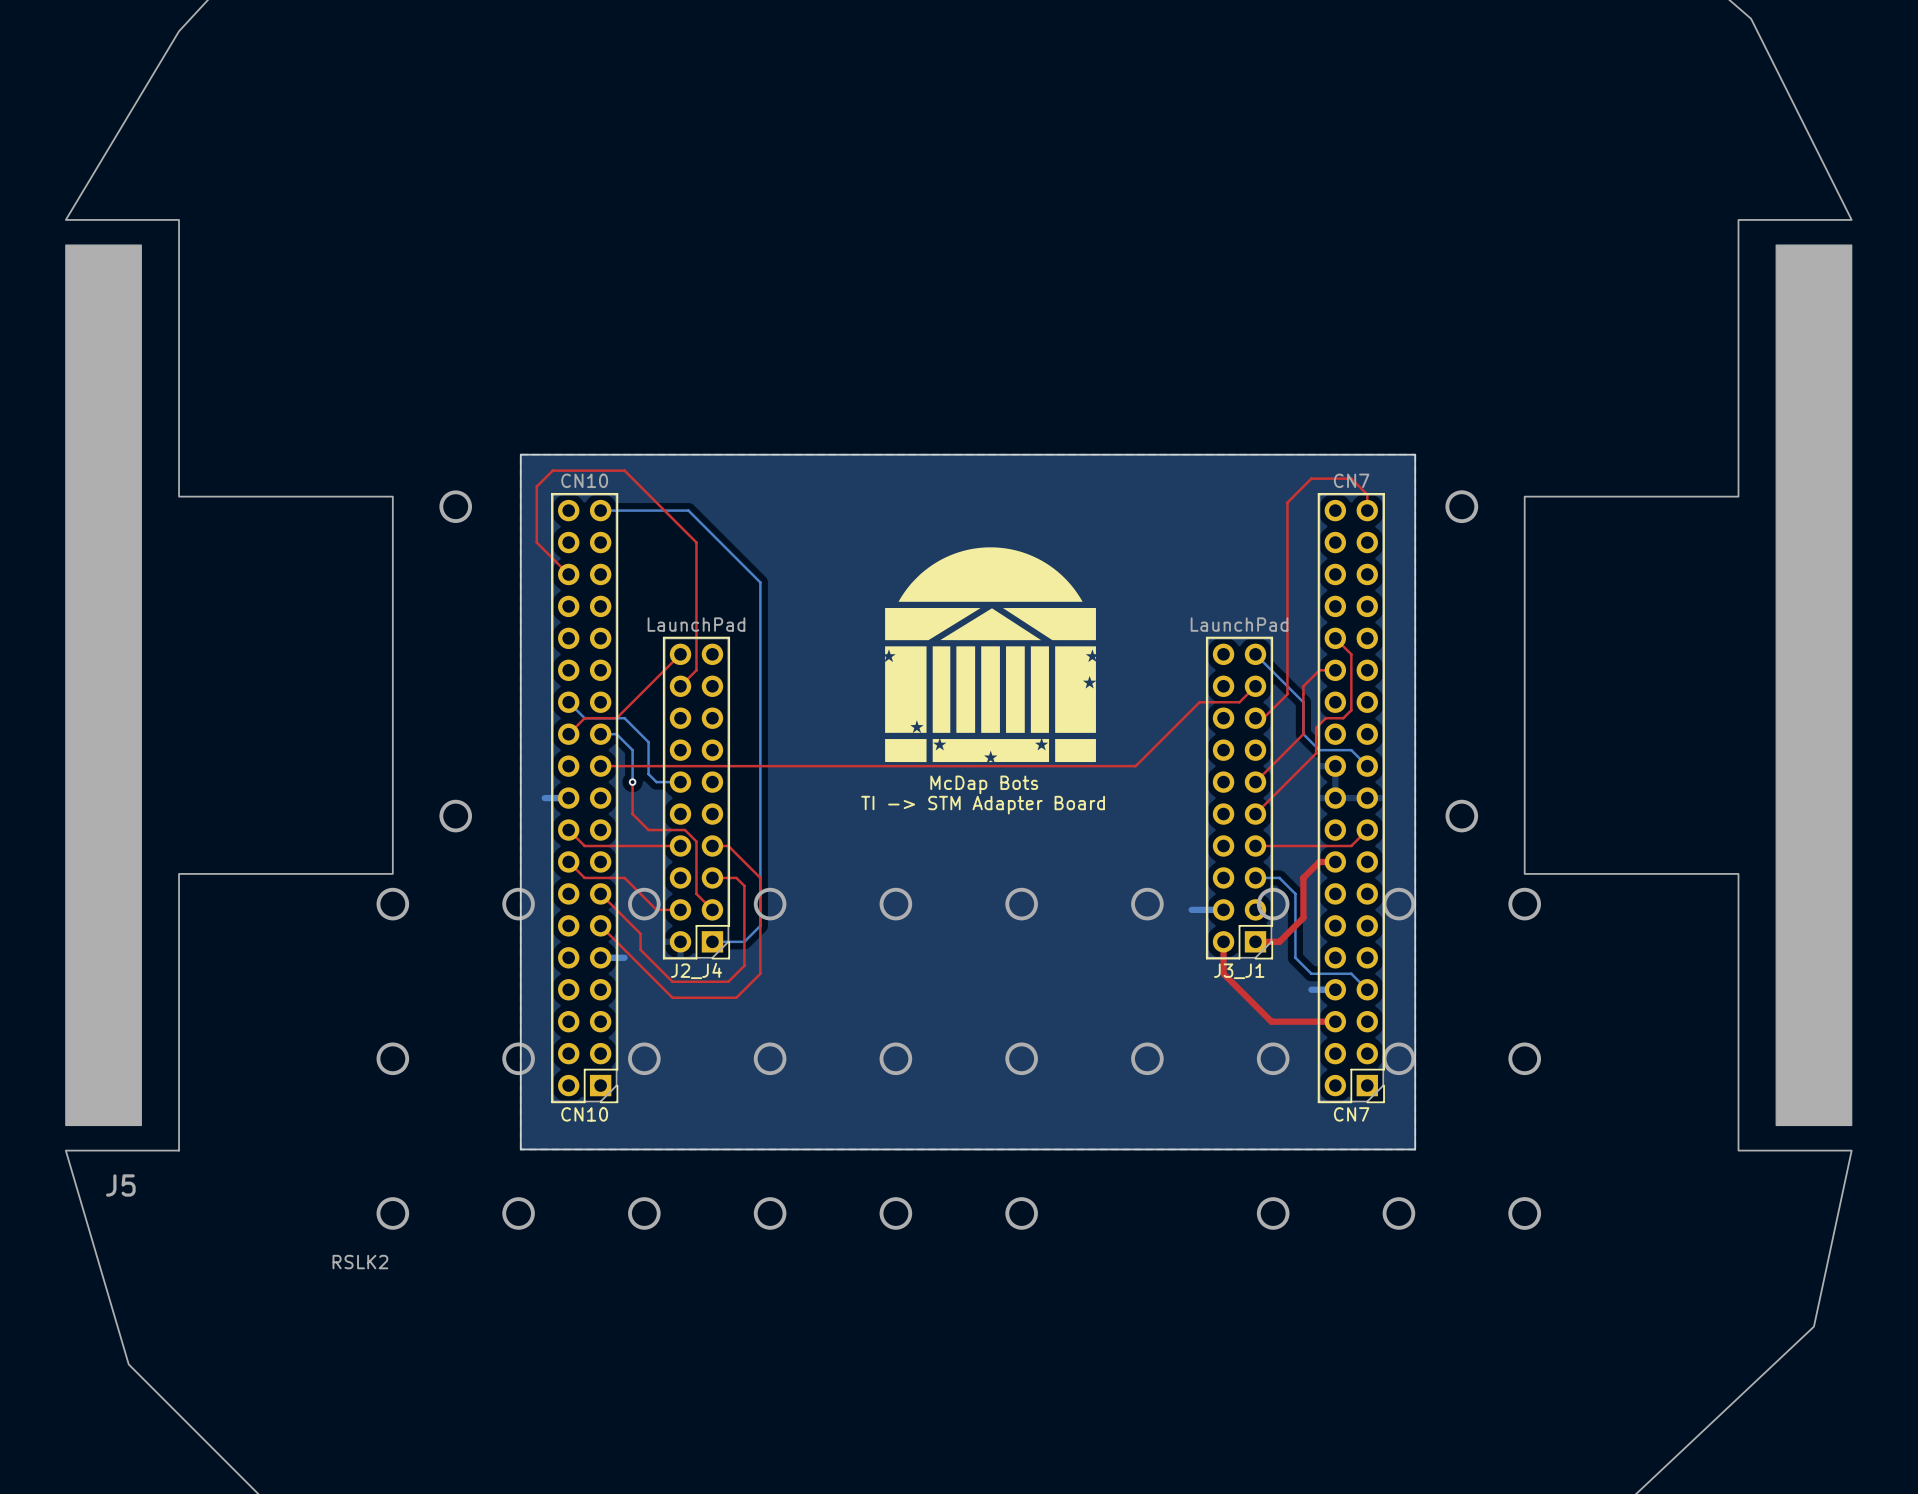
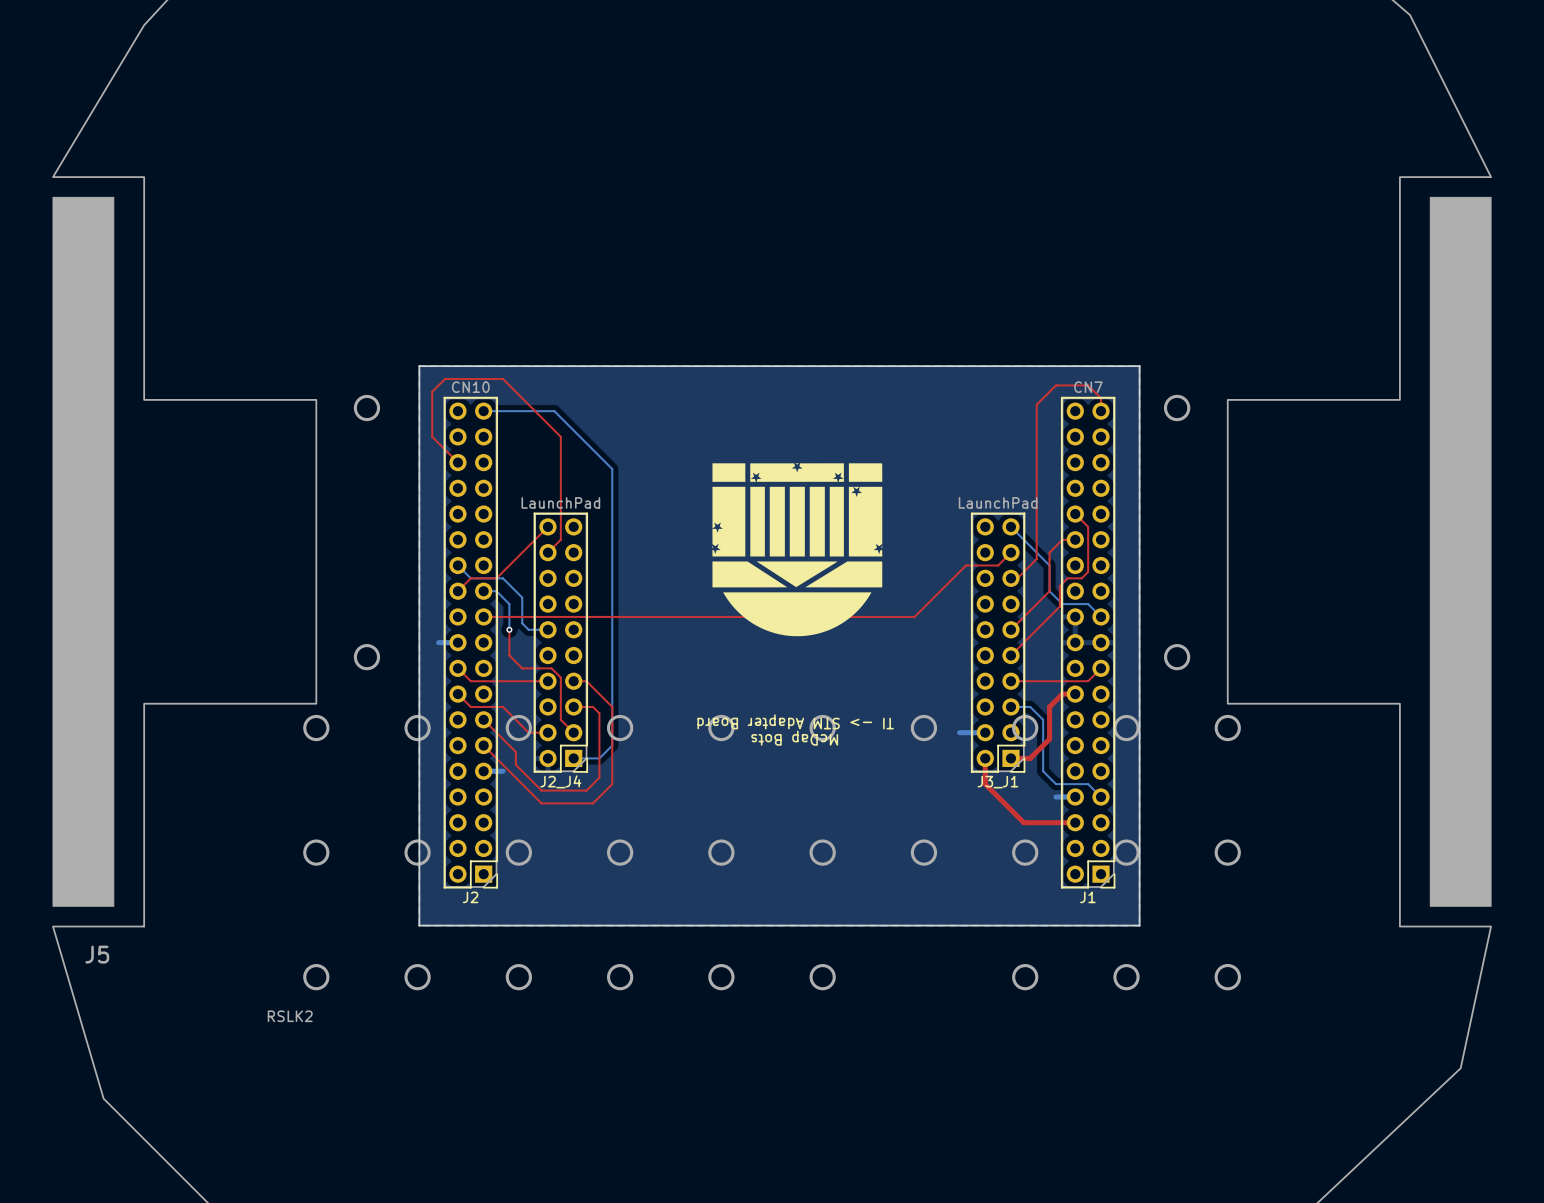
drawing: [885, 547, 1096, 763] -> none
drawing: none -> [712, 463, 883, 637]
text rotation: 0° (984, 784) -> 180° (794, 738)
text position: McDap Bots (984, 784) -> McDap Bots (794, 738)
text rotation: 0° (983, 805) -> 180° (795, 721)
CN10 name: CN10 (584, 1114) -> J2 (470, 897)
CN7 name: CN7 (1351, 1114) -> J1 (1087, 897)

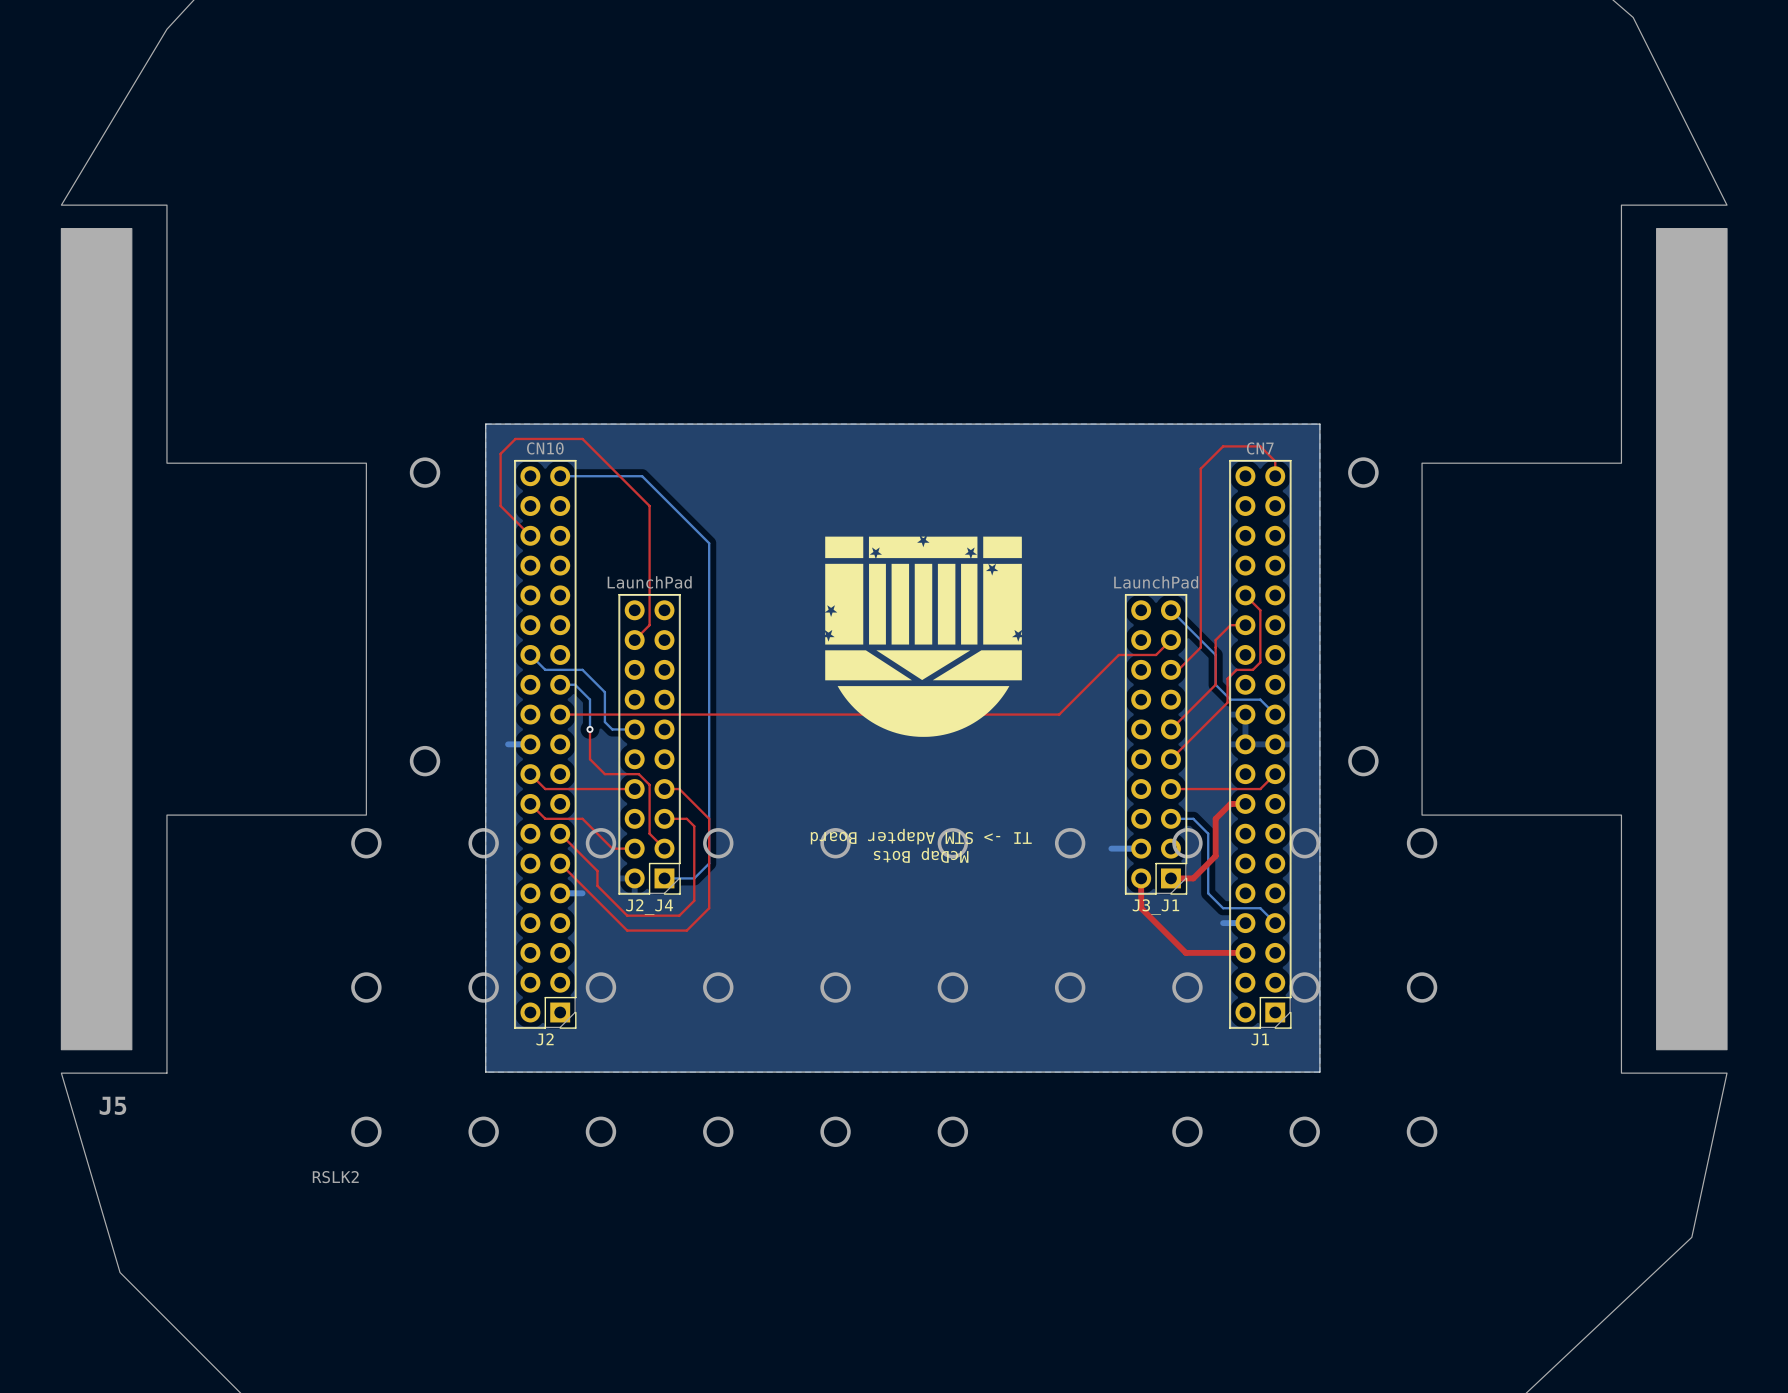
top track: (547, 526) (496, 578) (470, 578) (457, 591) -> none

